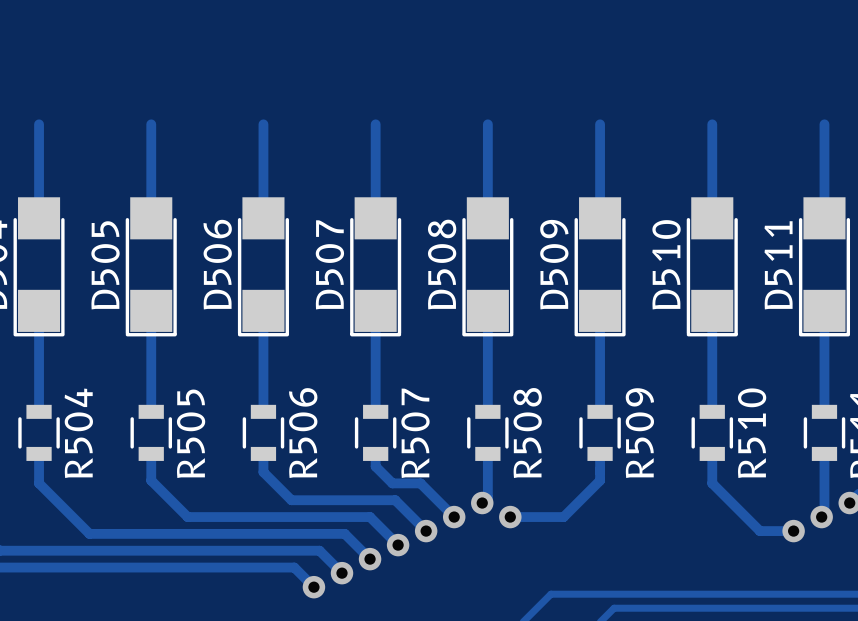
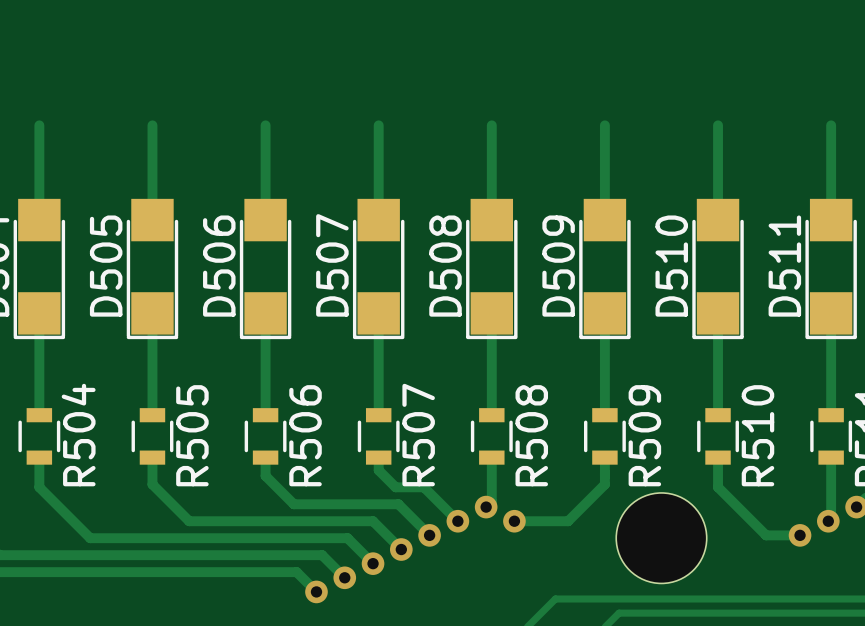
part: none -> (661, 538)

